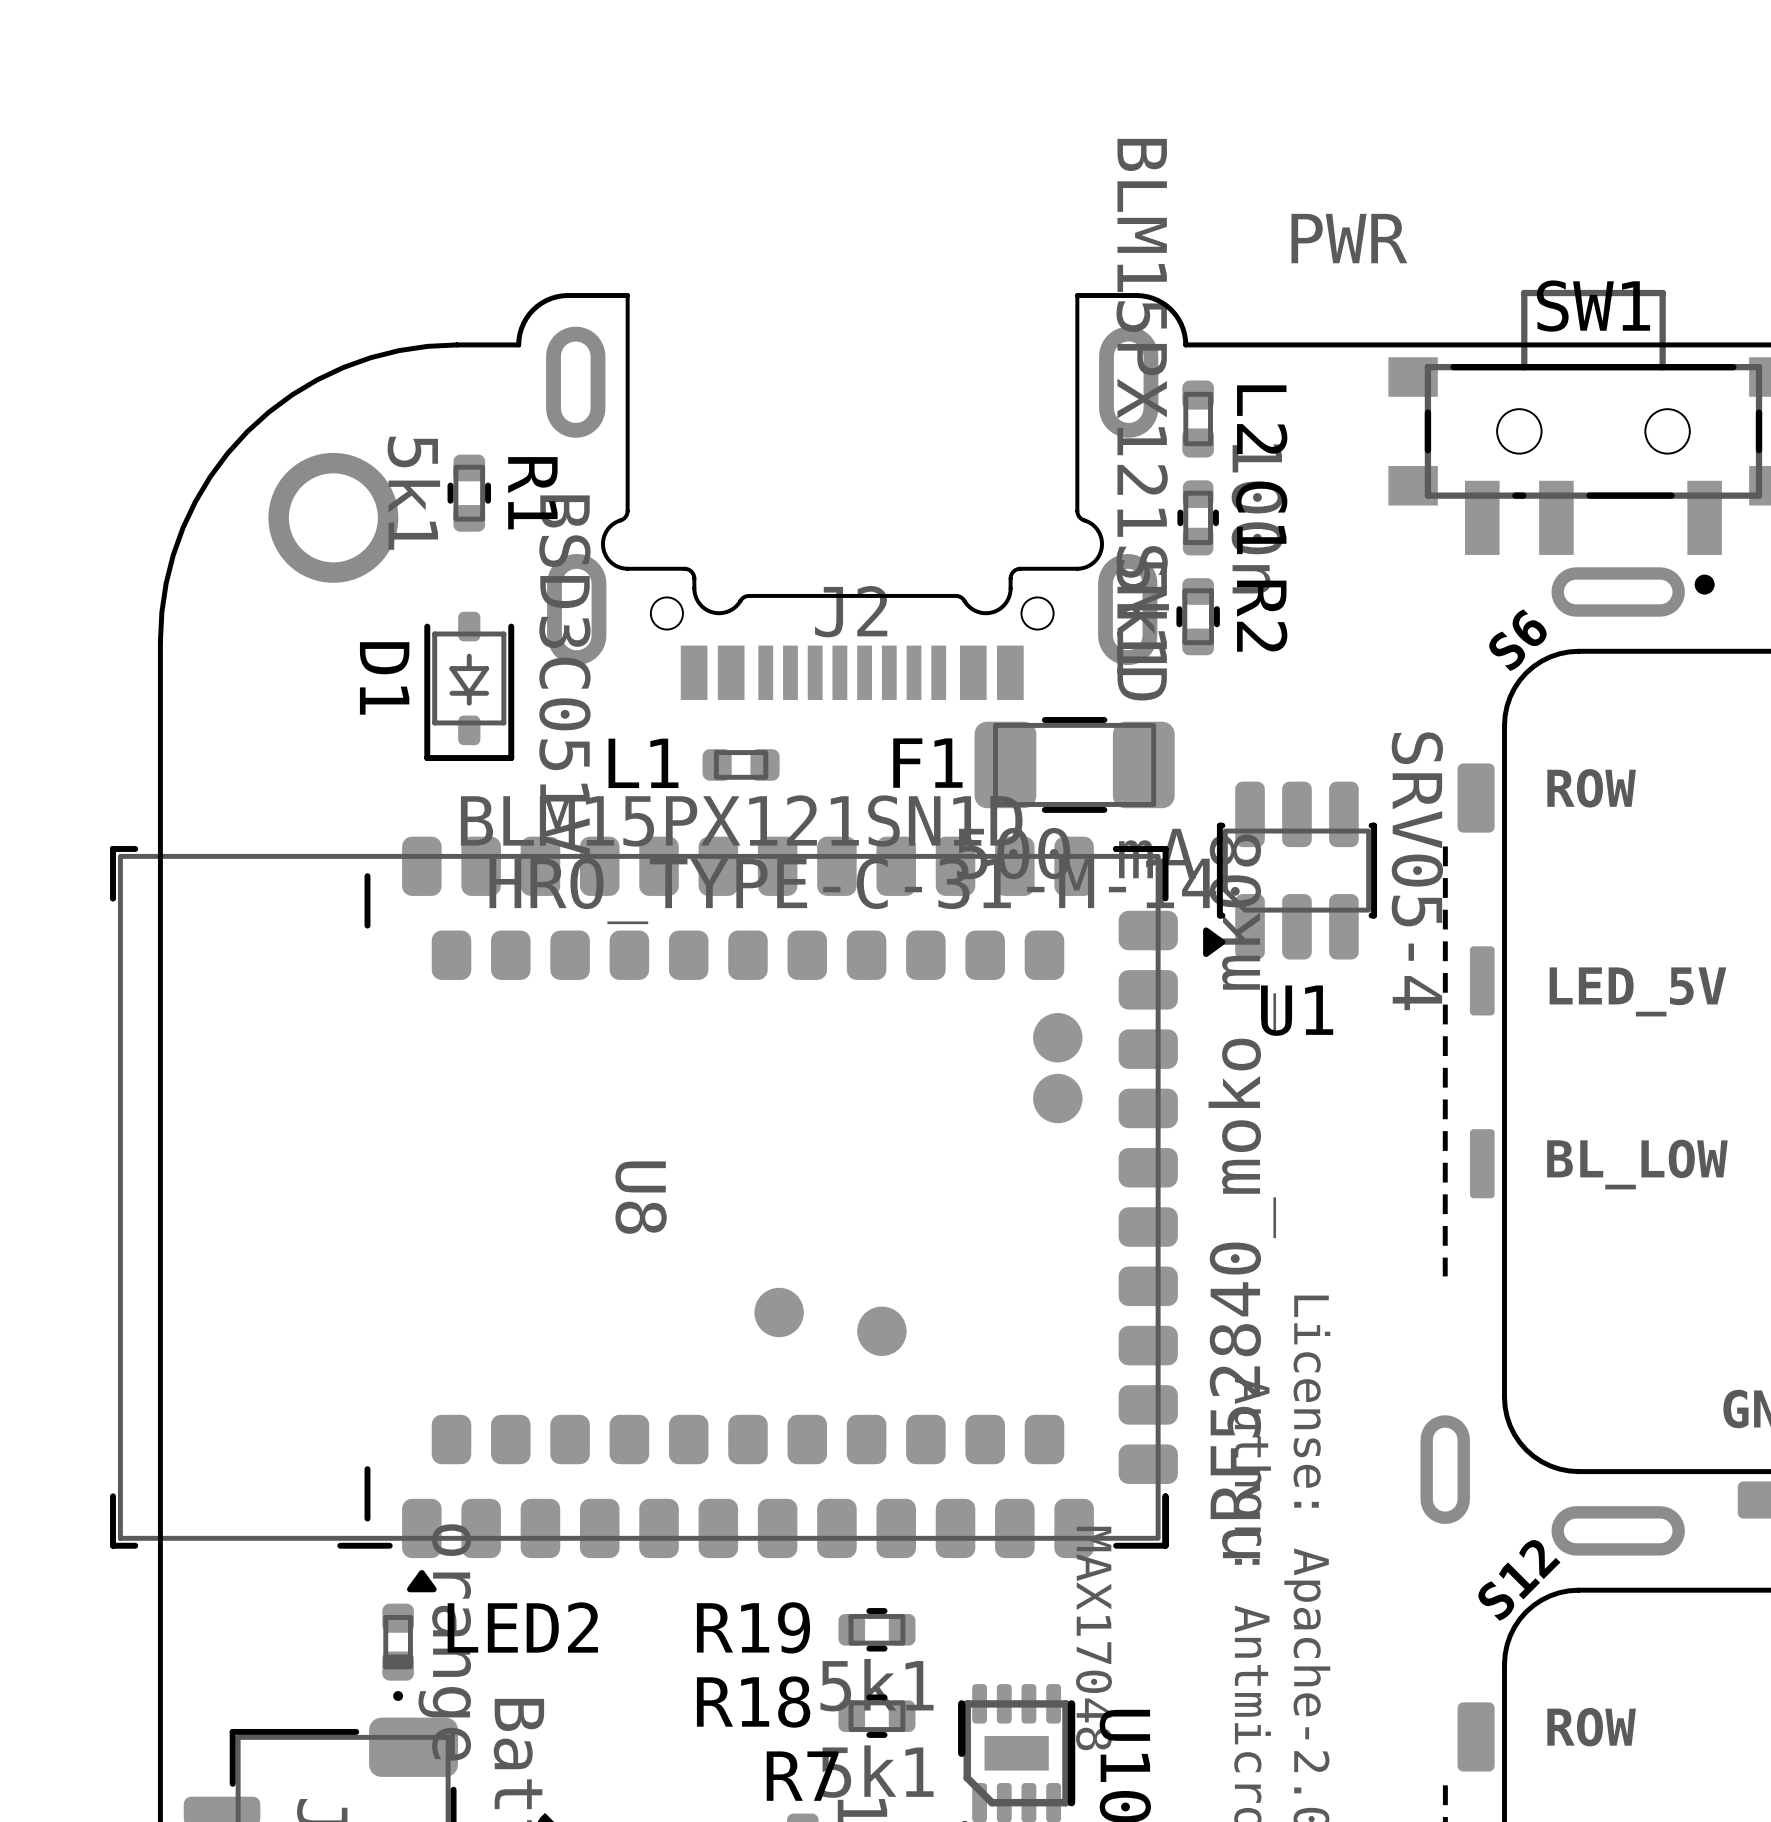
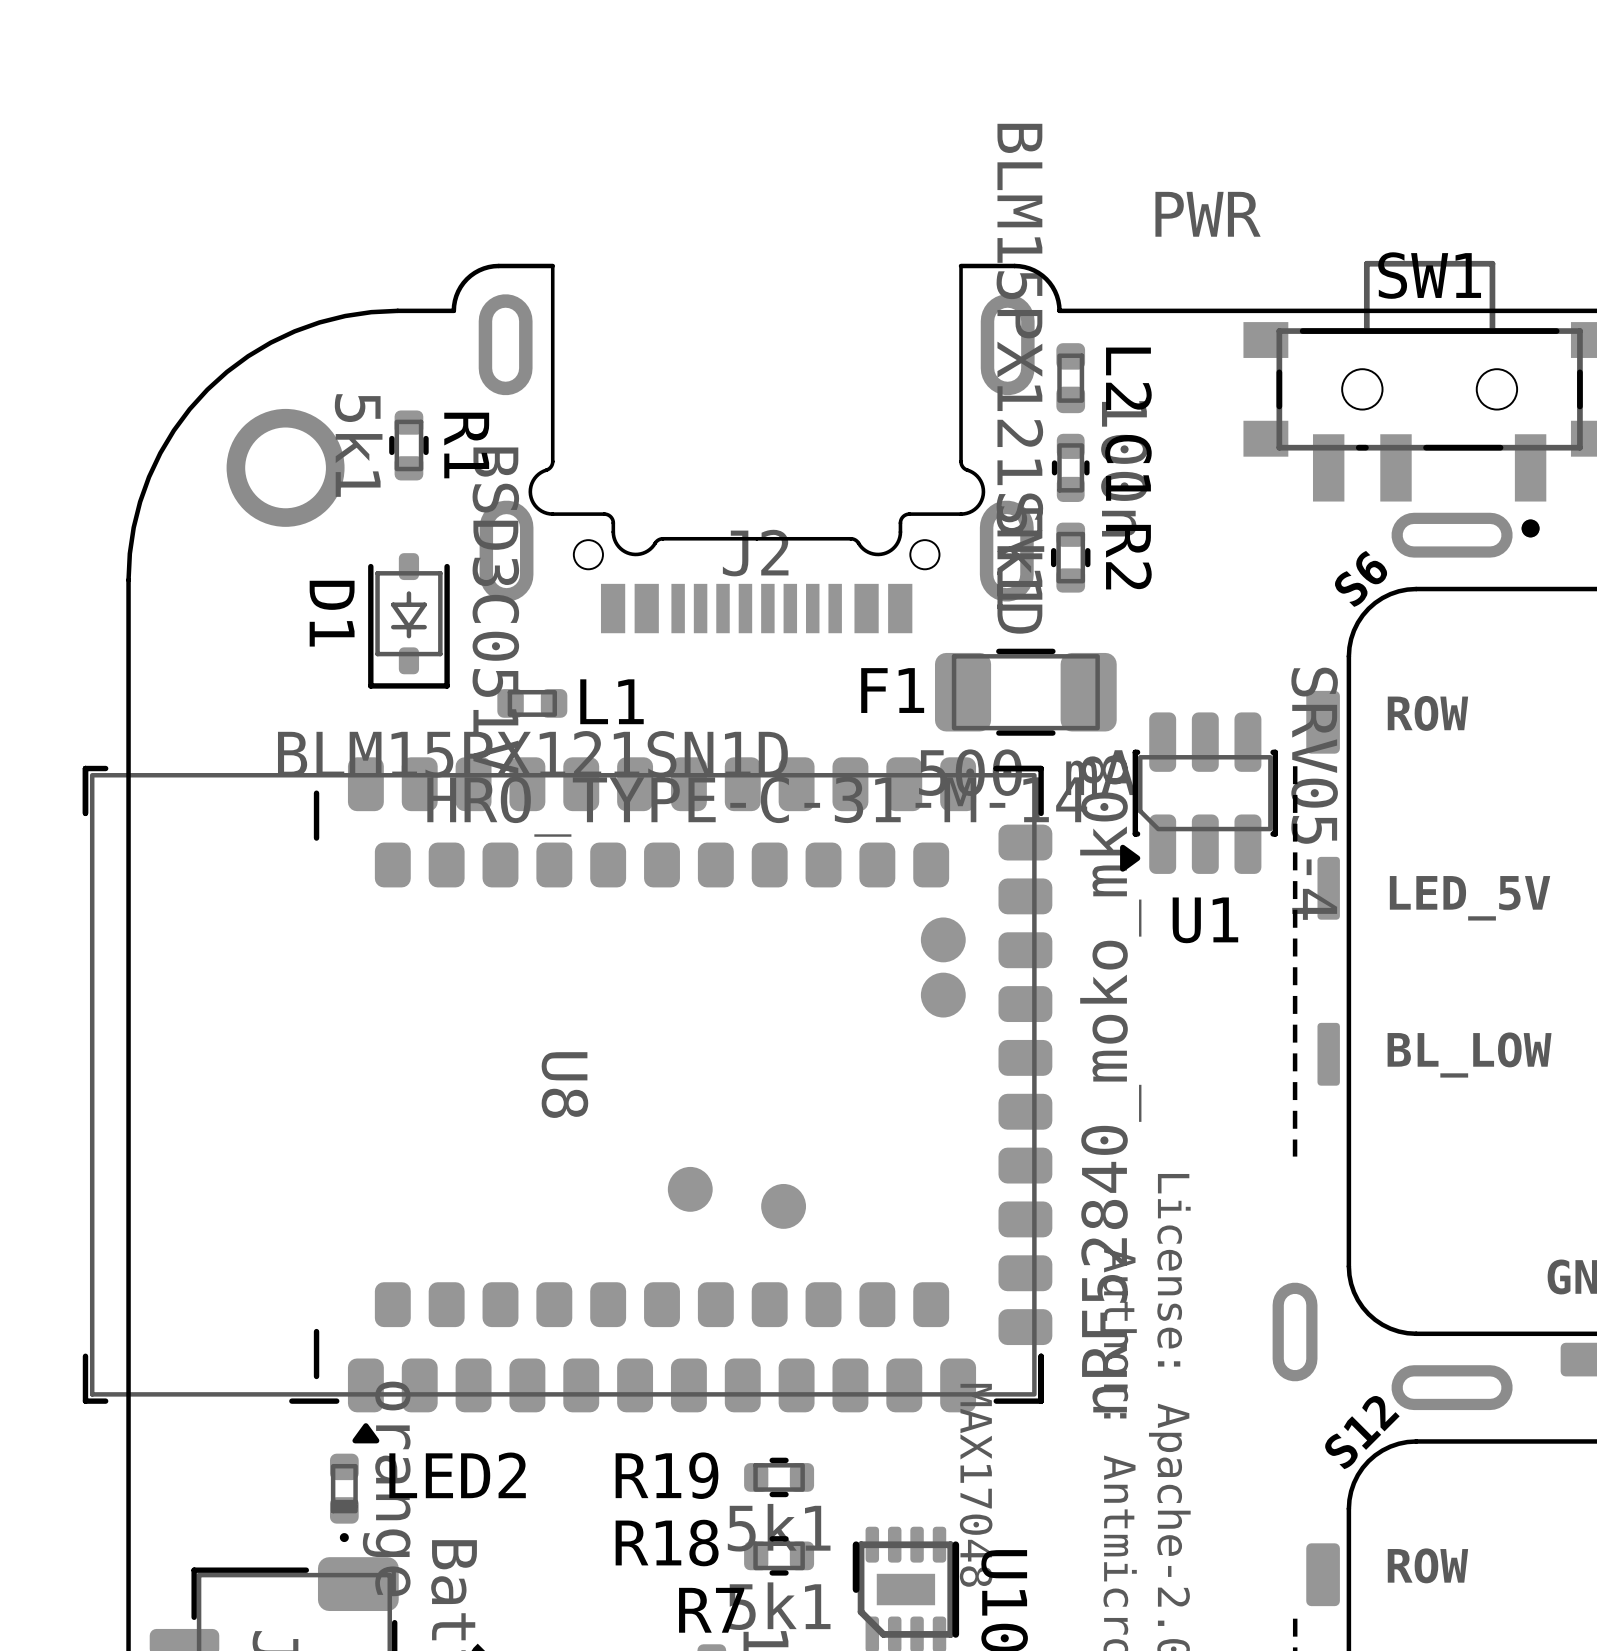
L1 name position: L1 (643, 763) -> L1 (611, 701)
L1 position: (741, 764) -> (532, 703)
F1 position: (1074, 764) -> (1025, 692)
U1 position: (1290, 870) -> (1199, 793)

